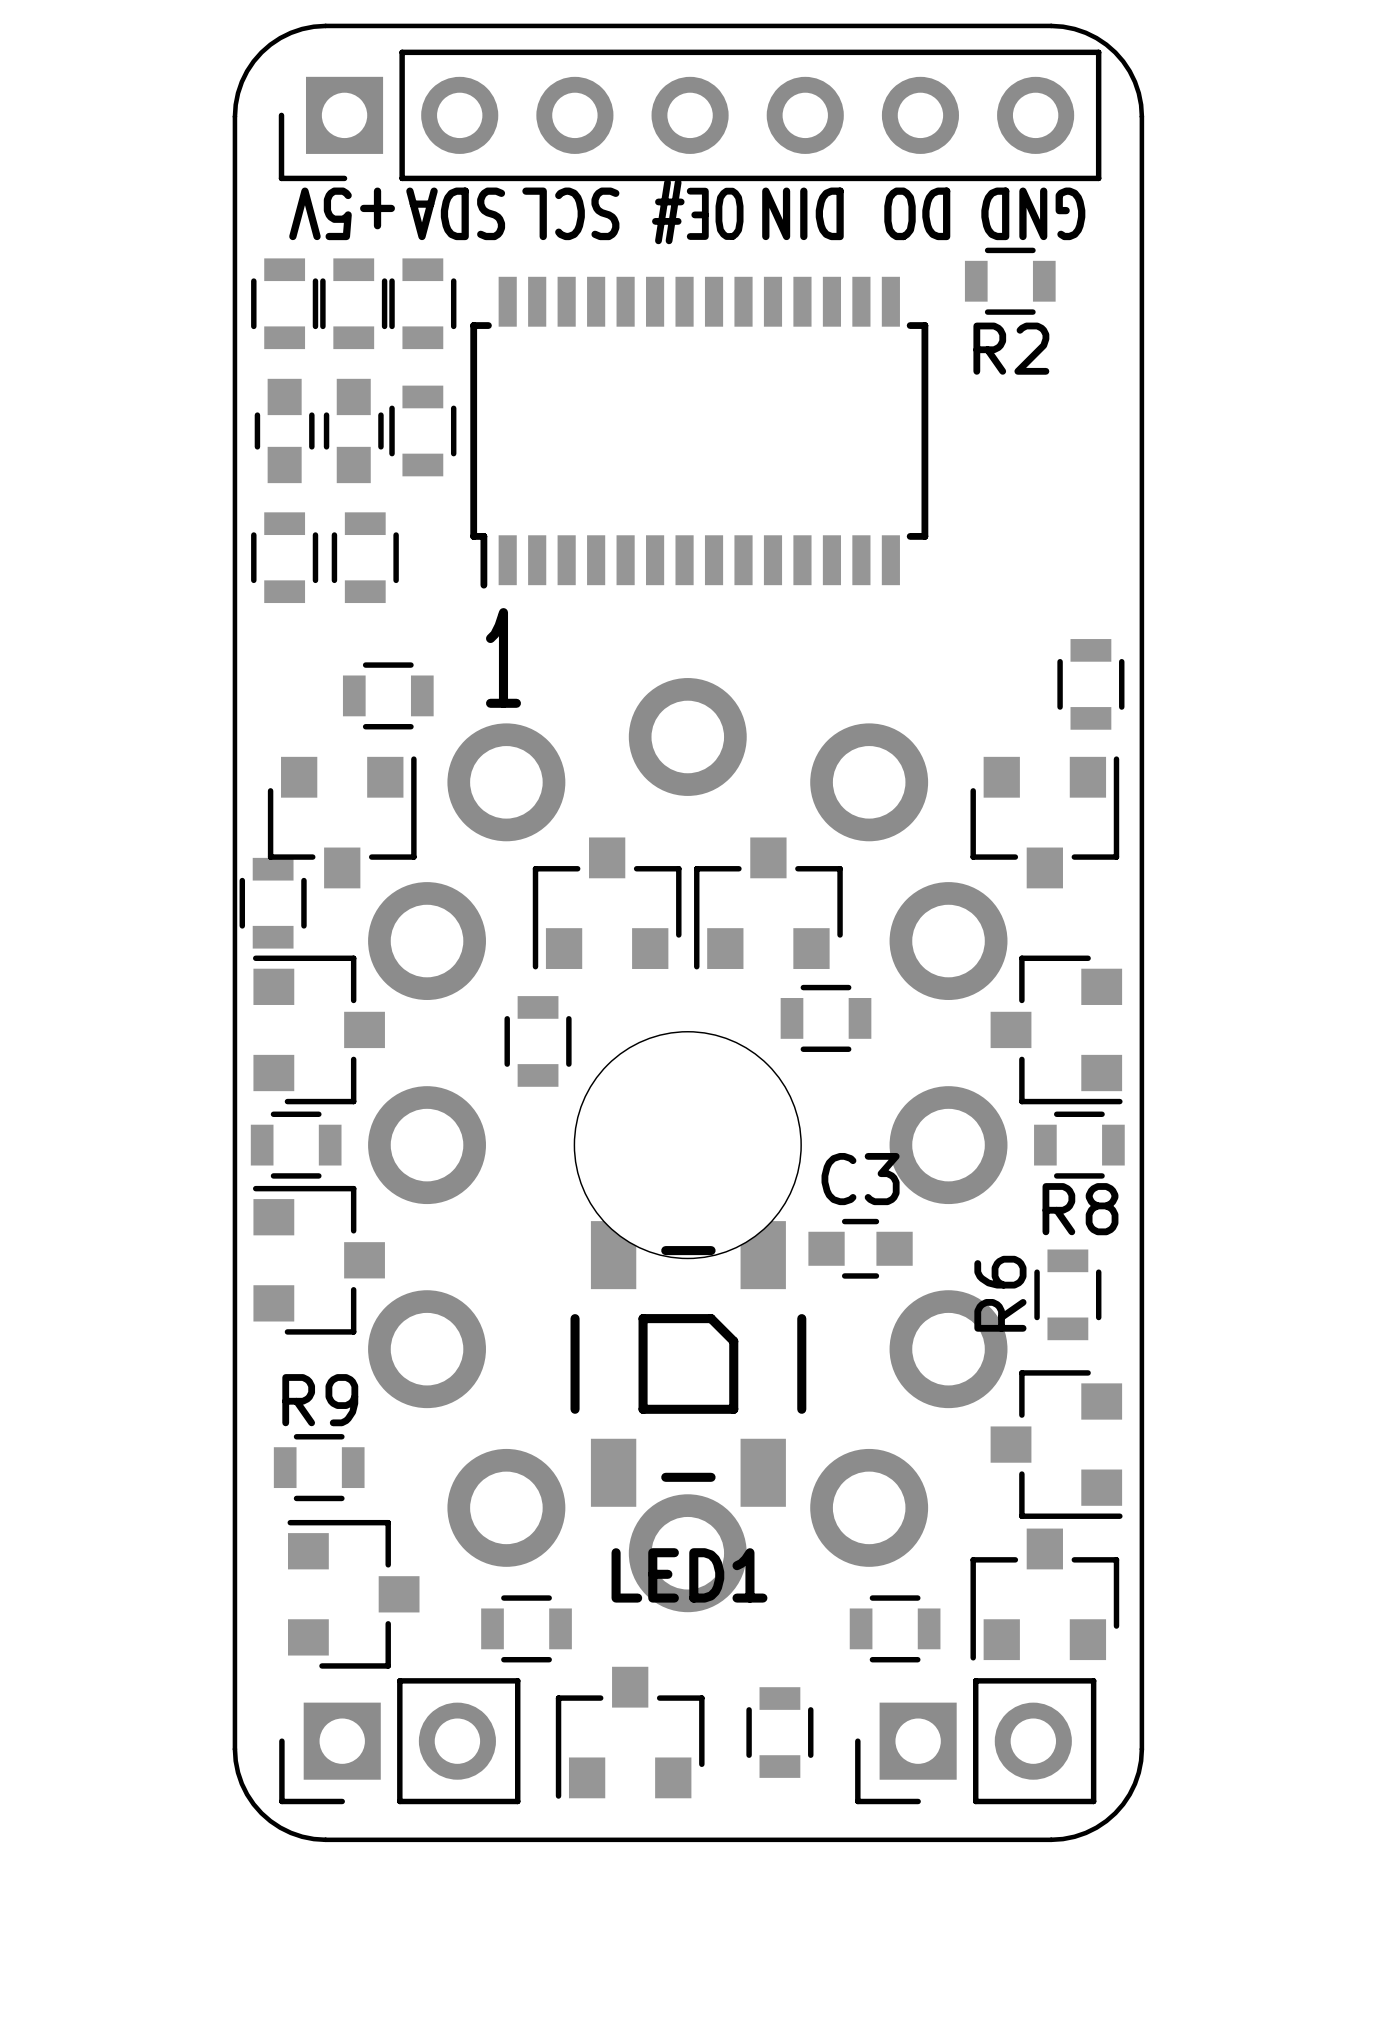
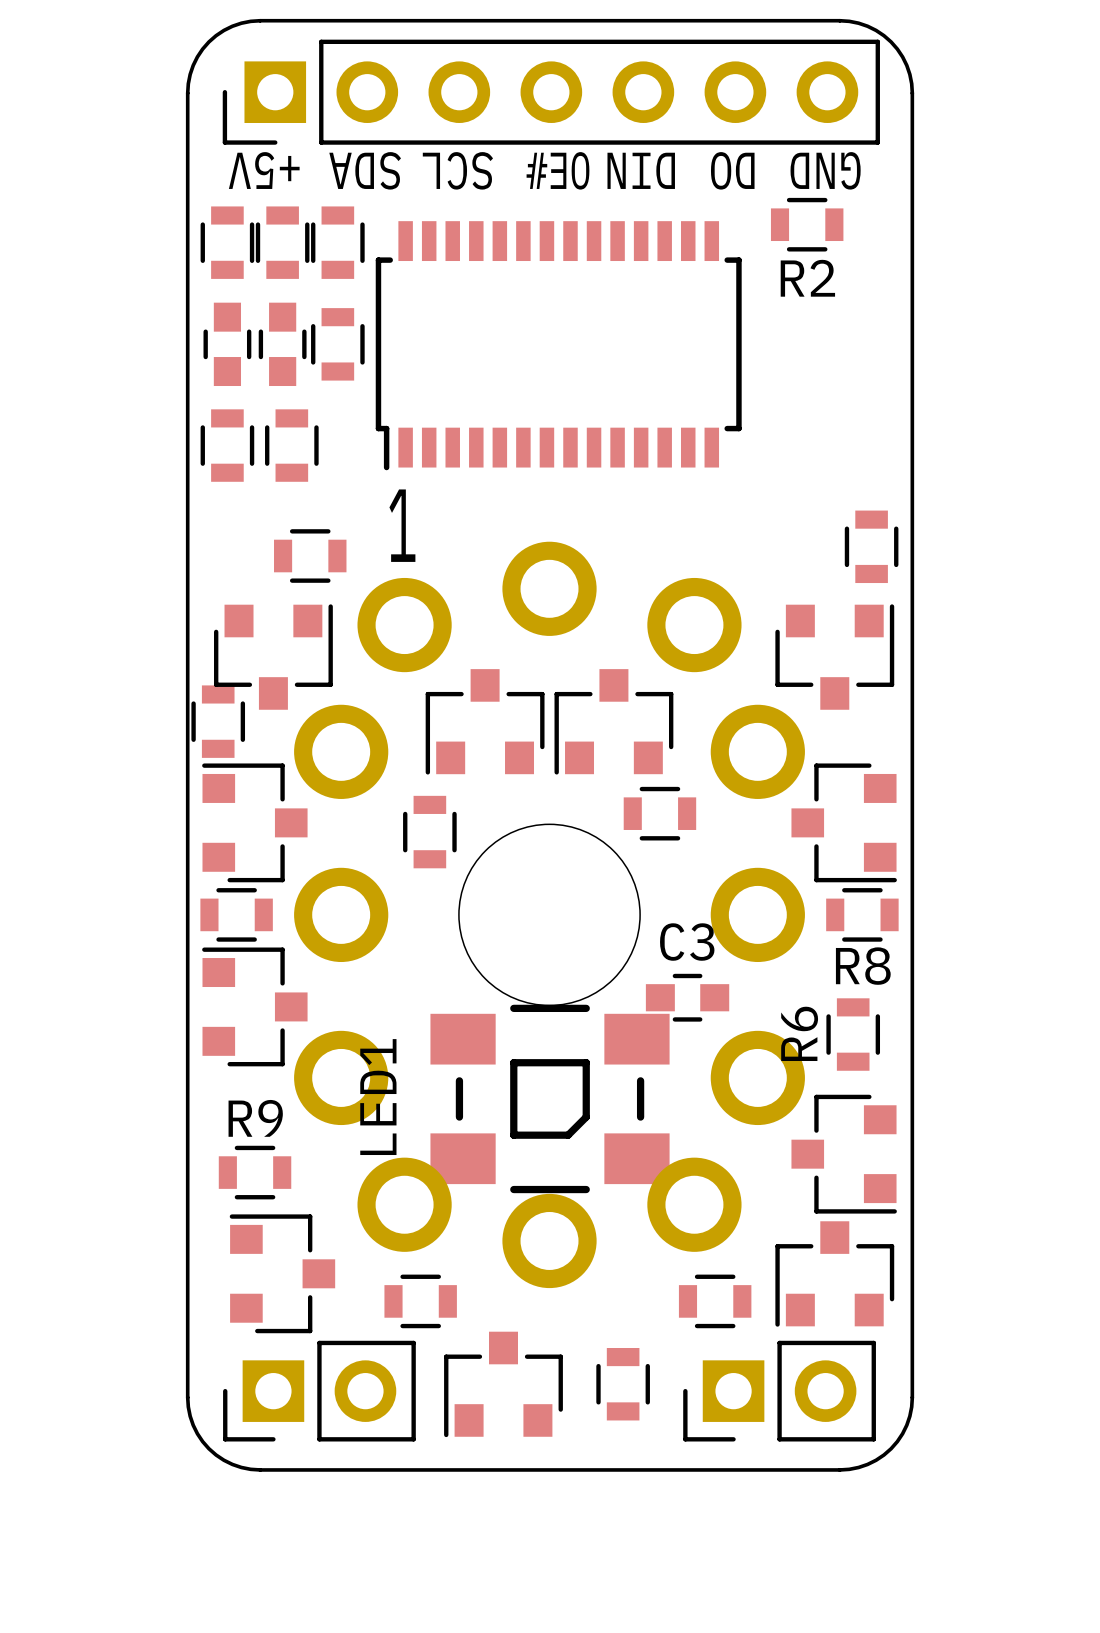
LED1 footprint: [570, 1221, 807, 1507] -> [430, 1004, 670, 1194]
LED1 name position: LED1 (689, 1575) -> LED1 (378, 1097)

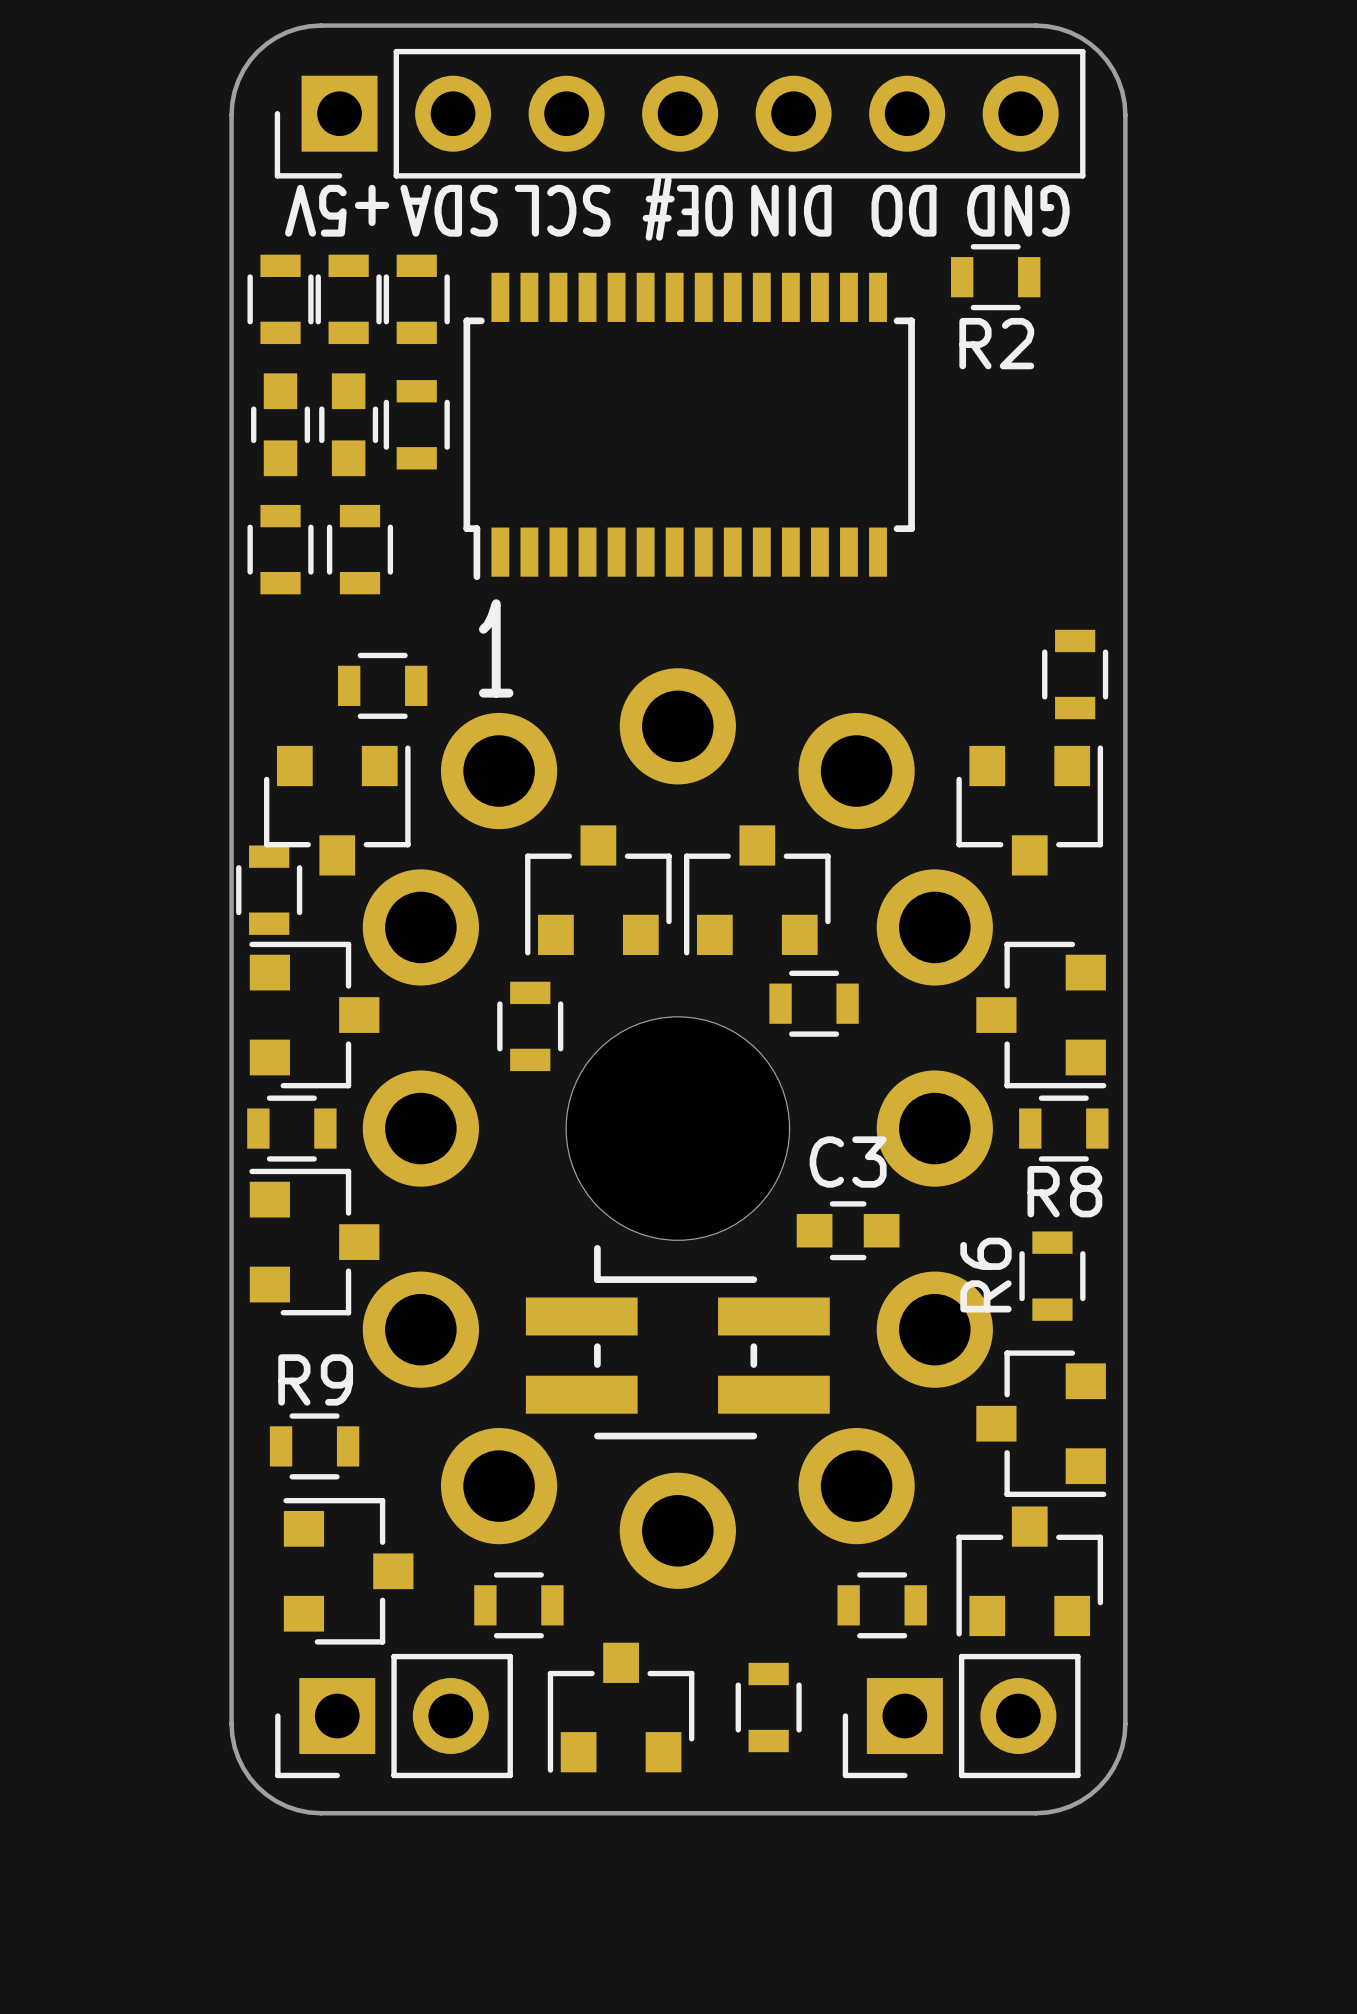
part: none -> (677, 1342)
LED1: (550, 1098) -> none

